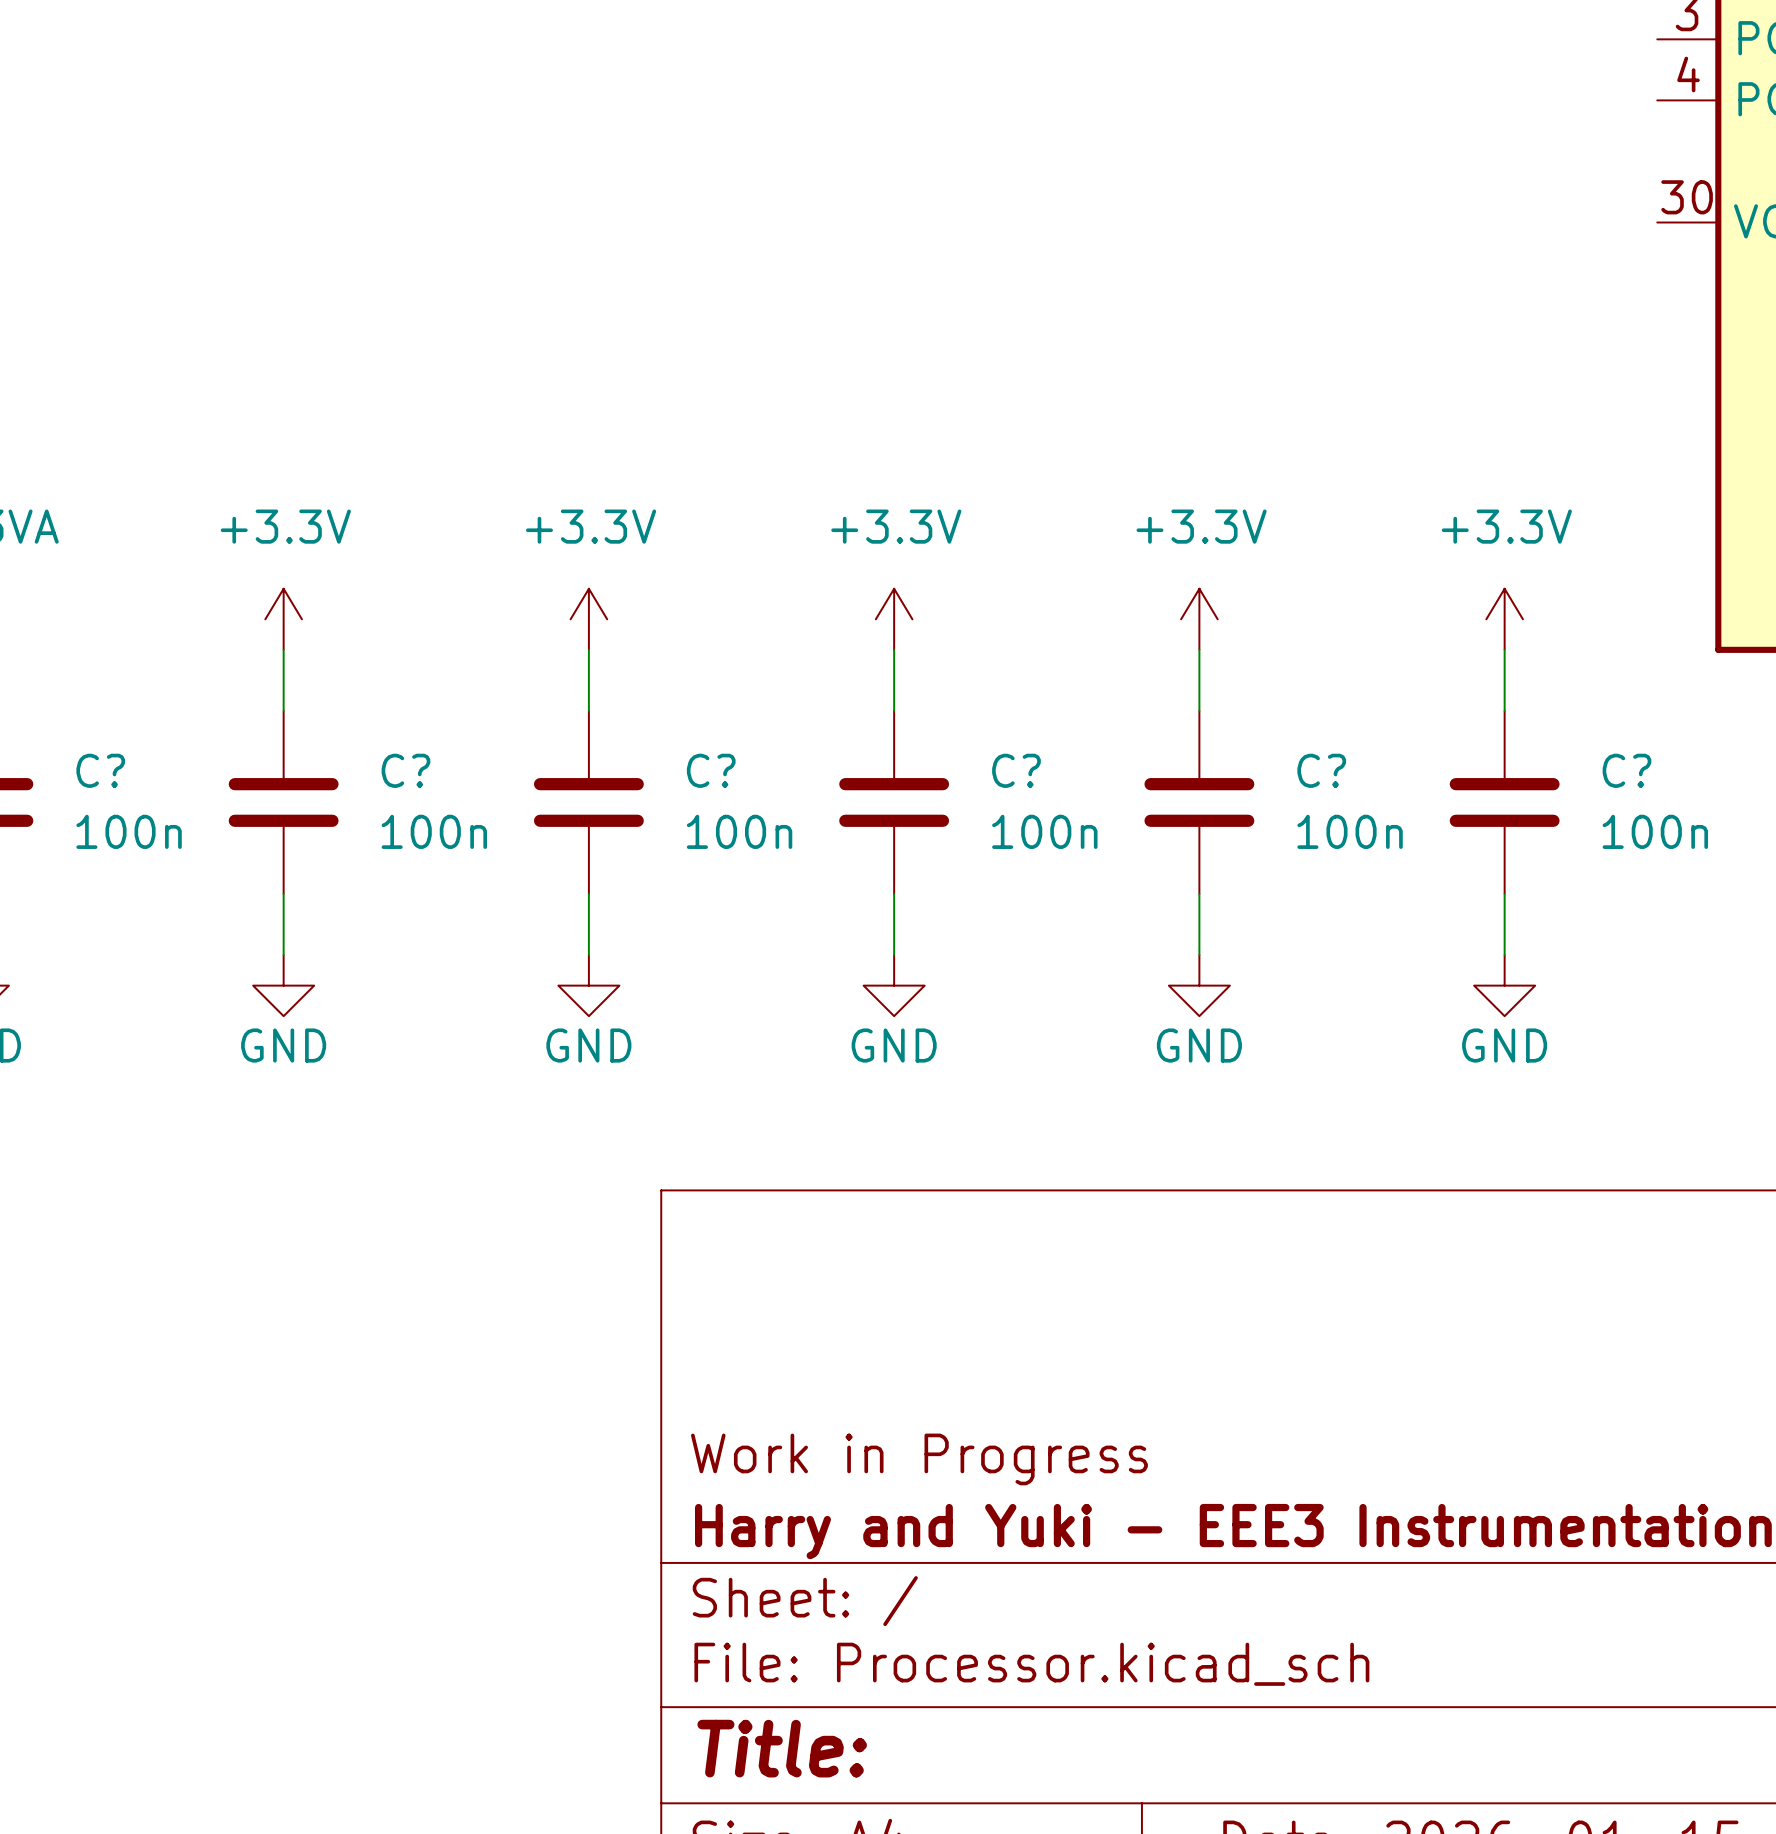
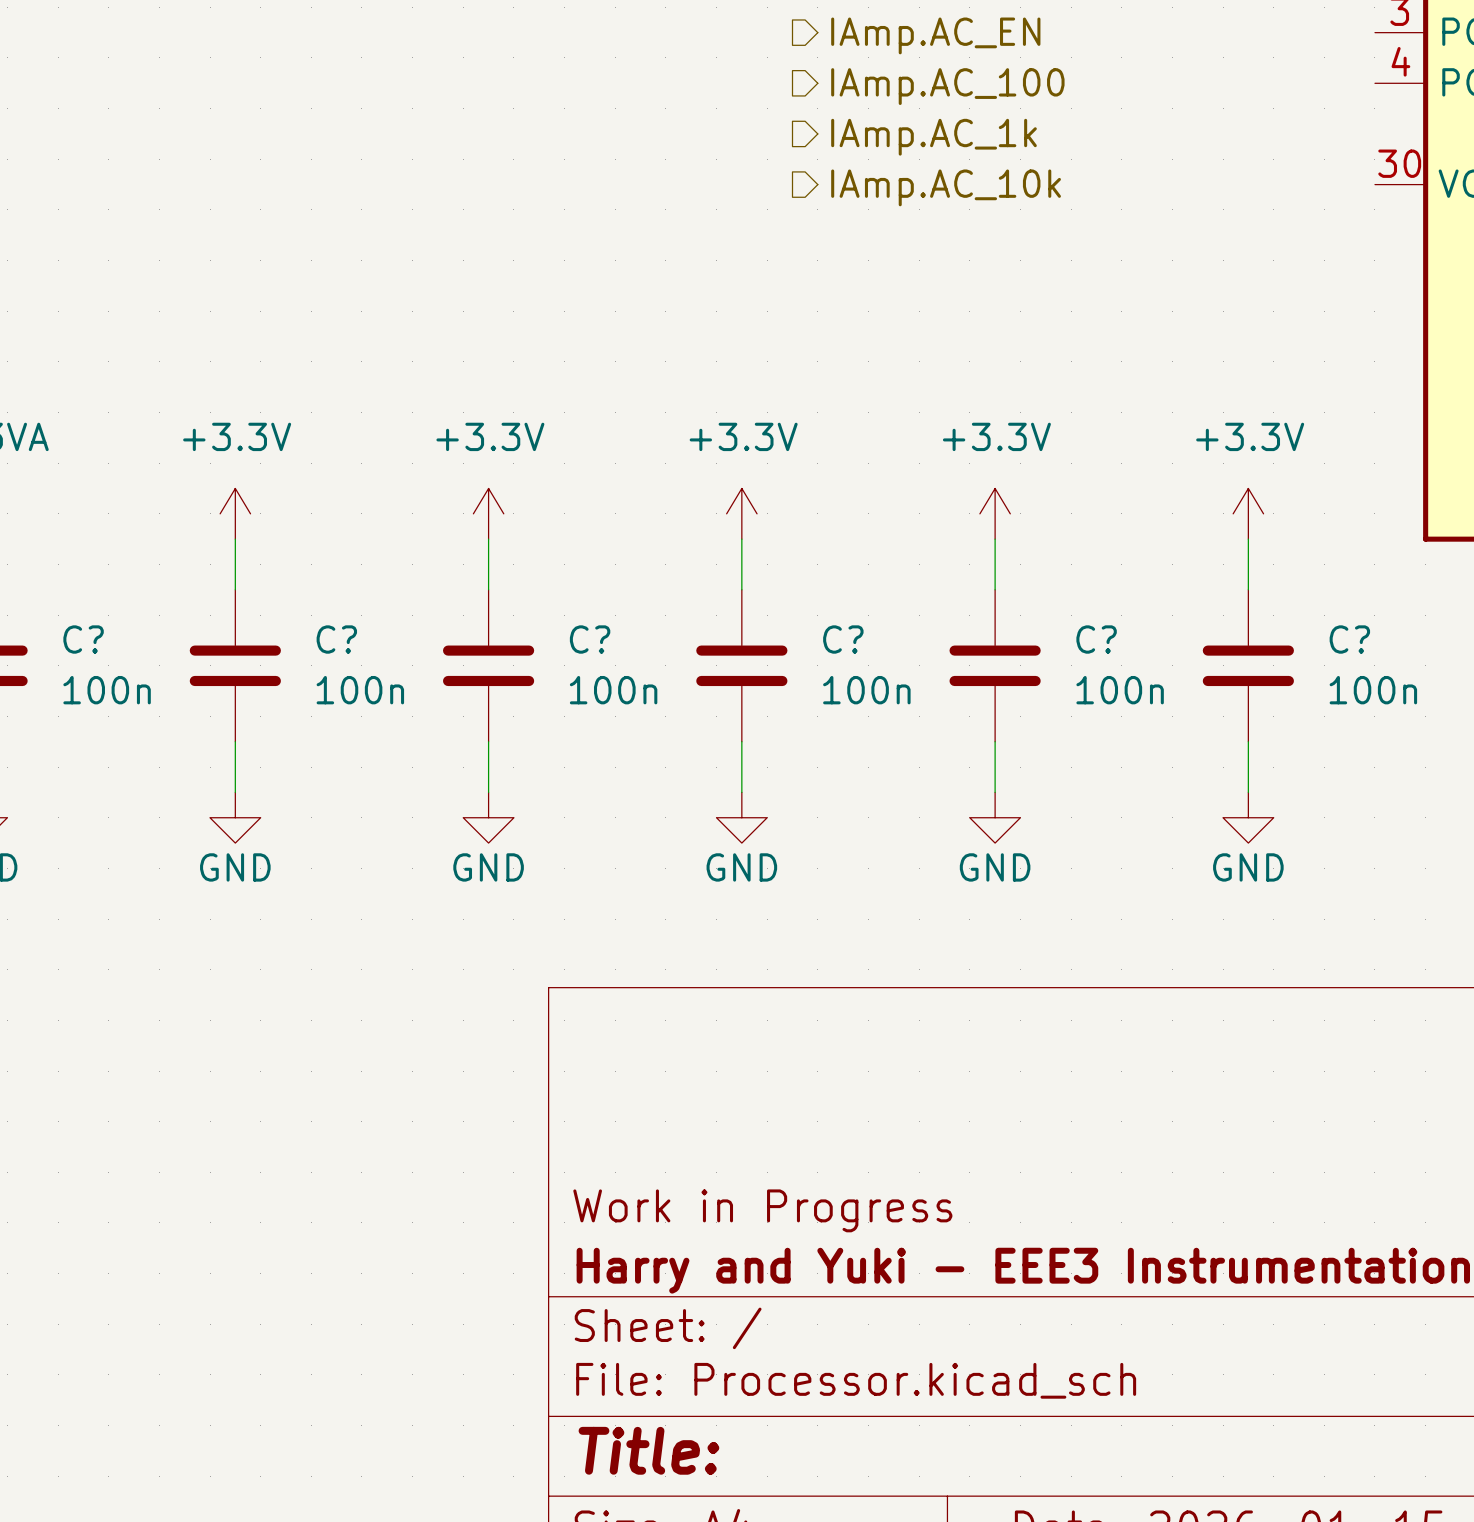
hierarchical label: none -> IAmp.AC_EN (935, 35)
hierarchical label: none -> IAmp.AC_100 (947, 86)
hierarchical label: none -> IAmp.AC_1k (933, 137)
hierarchical label: none -> IAmp.AC_10k (946, 187)

